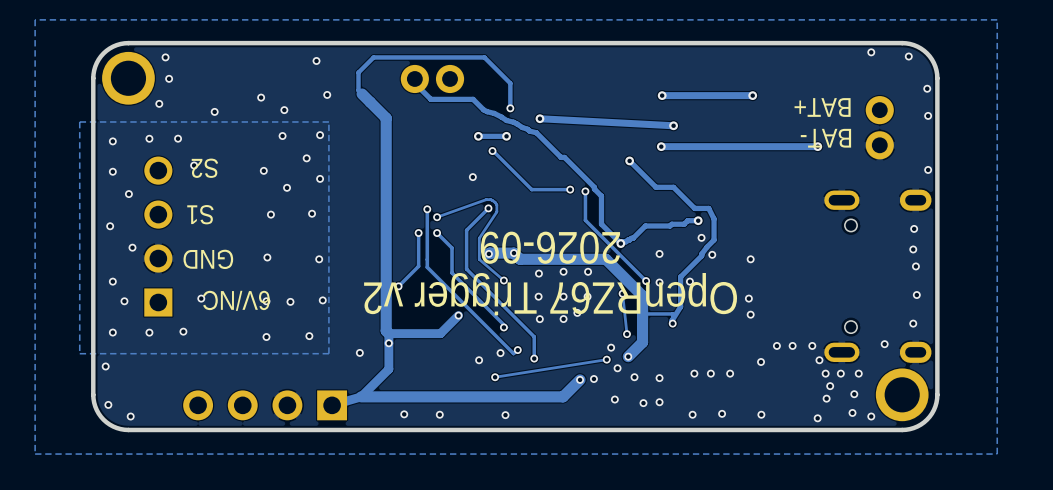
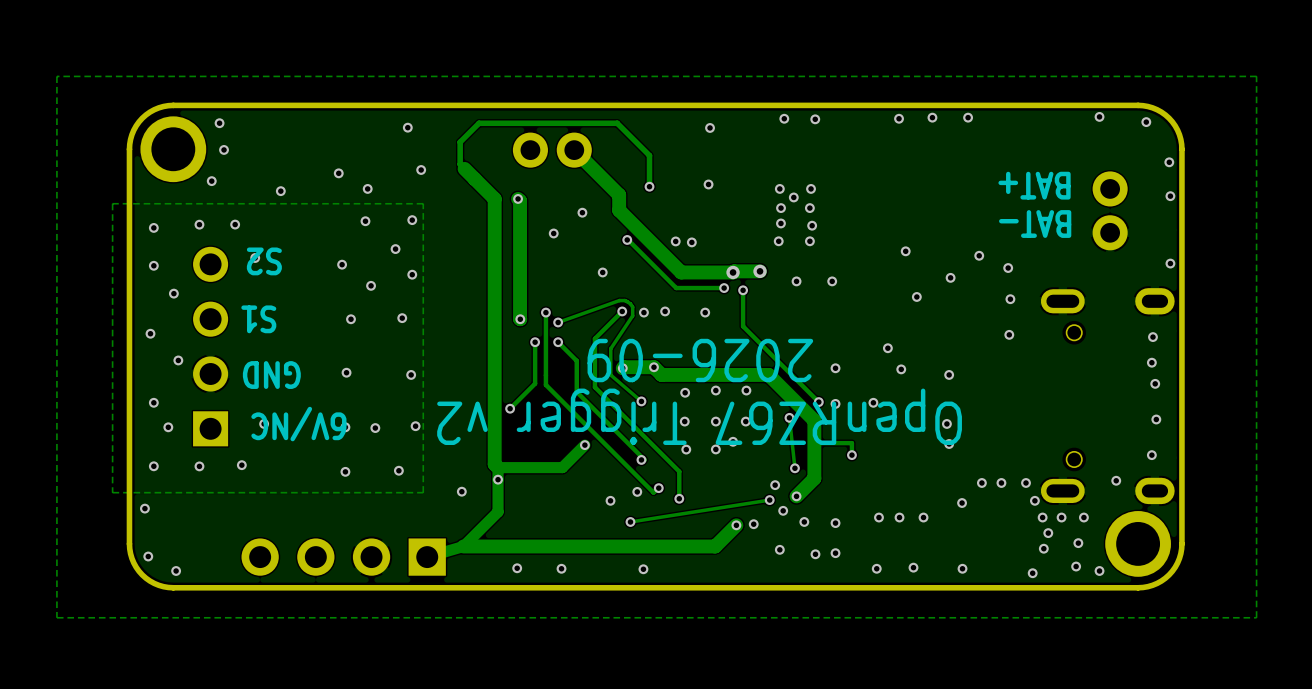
via: none -> (932, 117)
via: none -> (968, 117)
via: none -> (784, 118)
via: none -> (899, 118)
via: none -> (815, 119)
via: none -> (710, 127)
track: (414, 78) (418, 87) (430, 99) (473, 99) (483, 109) (536, 132) (561, 157) (564, 157) (601, 196) (601, 224) (620, 243) (633, 238) (645, 225) (670, 225) (671, 224) (684, 224) (687, 220) (698, 220) -> none
track: none -> (574, 150) (619, 195) (619, 210) (681, 272) (760, 271)
via: (662, 95) -> none
track: (752, 95) (662, 95) -> none
via: (752, 95) -> none
via: none -> (708, 184)
via: none -> (779, 188)
via: none -> (811, 188)
via: none -> (793, 197)
track: none -> (518, 198) (520, 200) (520, 318)
via: none -> (518, 198)
track: (539, 118) (673, 125) -> none
via: (539, 118) -> none
via: none -> (781, 208)
via: none -> (809, 208)
via: (673, 125) -> none
via: none -> (582, 212)
via: (478, 136) -> none
track: (506, 136) (478, 136) -> none
via: (506, 136) -> none
via: none -> (780, 223)
via: none -> (812, 225)
via: none -> (553, 233)
via: (661, 146) -> none
track: (817, 146) (661, 146) -> none
via: (817, 146) -> none
via: none -> (675, 241)
via: none -> (691, 242)
via: none -> (778, 241)
via: none -> (809, 241)
track: (629, 160) (656, 187) (673, 187) (694, 208) (708, 208) (714, 218) (714, 240) (680, 276) (680, 306) (671, 320) (672, 323) -> none
via: (629, 160) -> none
via: none -> (905, 251)
via: none -> (979, 255)
via: none -> (1008, 268)
via: none -> (760, 271)
via: none -> (733, 272)
via: none -> (950, 277)
via: none -> (796, 281)
via: none -> (832, 281)
via: none -> (916, 296)
via: none -> (1010, 299)
via: none -> (665, 311)
via: none -> (643, 312)
via: none -> (705, 312)
via: none -> (520, 319)
via: (698, 220) -> none
via: none -> (1009, 334)
via: (620, 243) -> none

